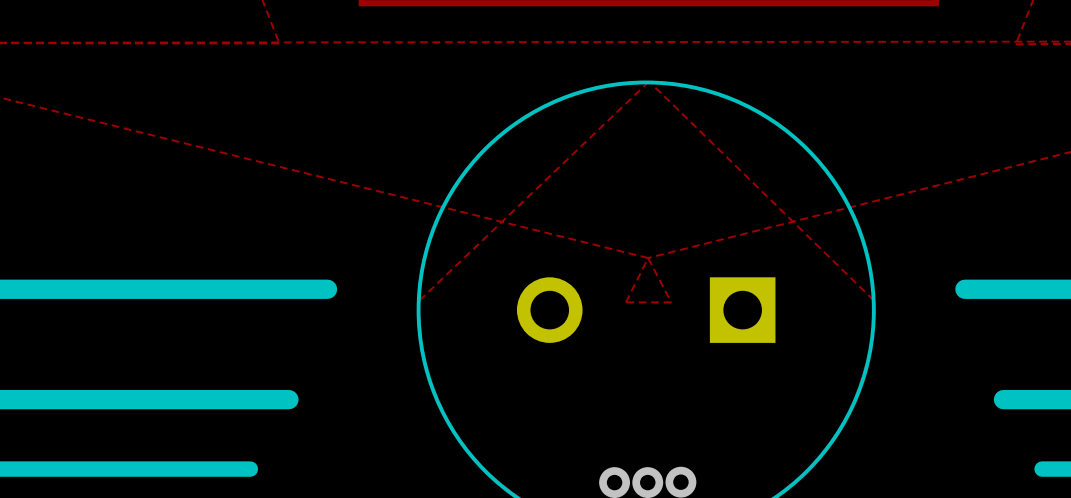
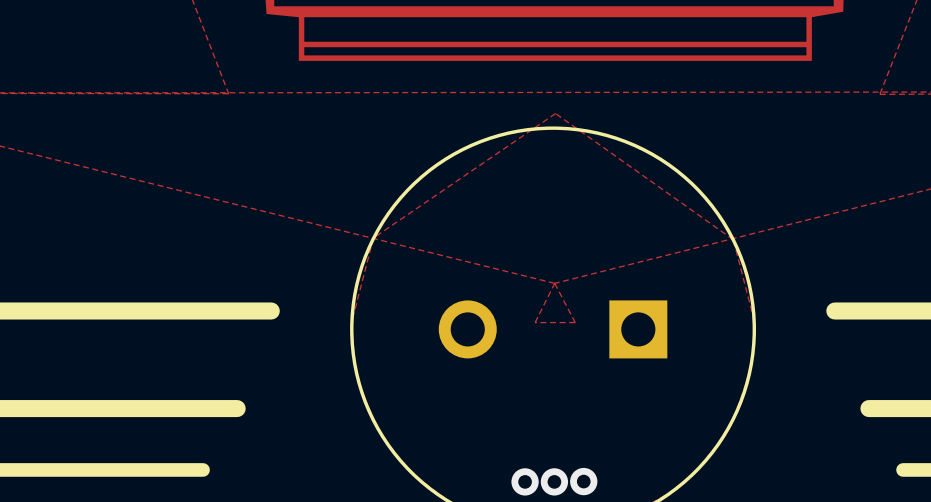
zone outline: (873, 300) (649, 81) (418, 301) -> (754, 320) (733, 239) (555, 113) (373, 238) (351, 321)

